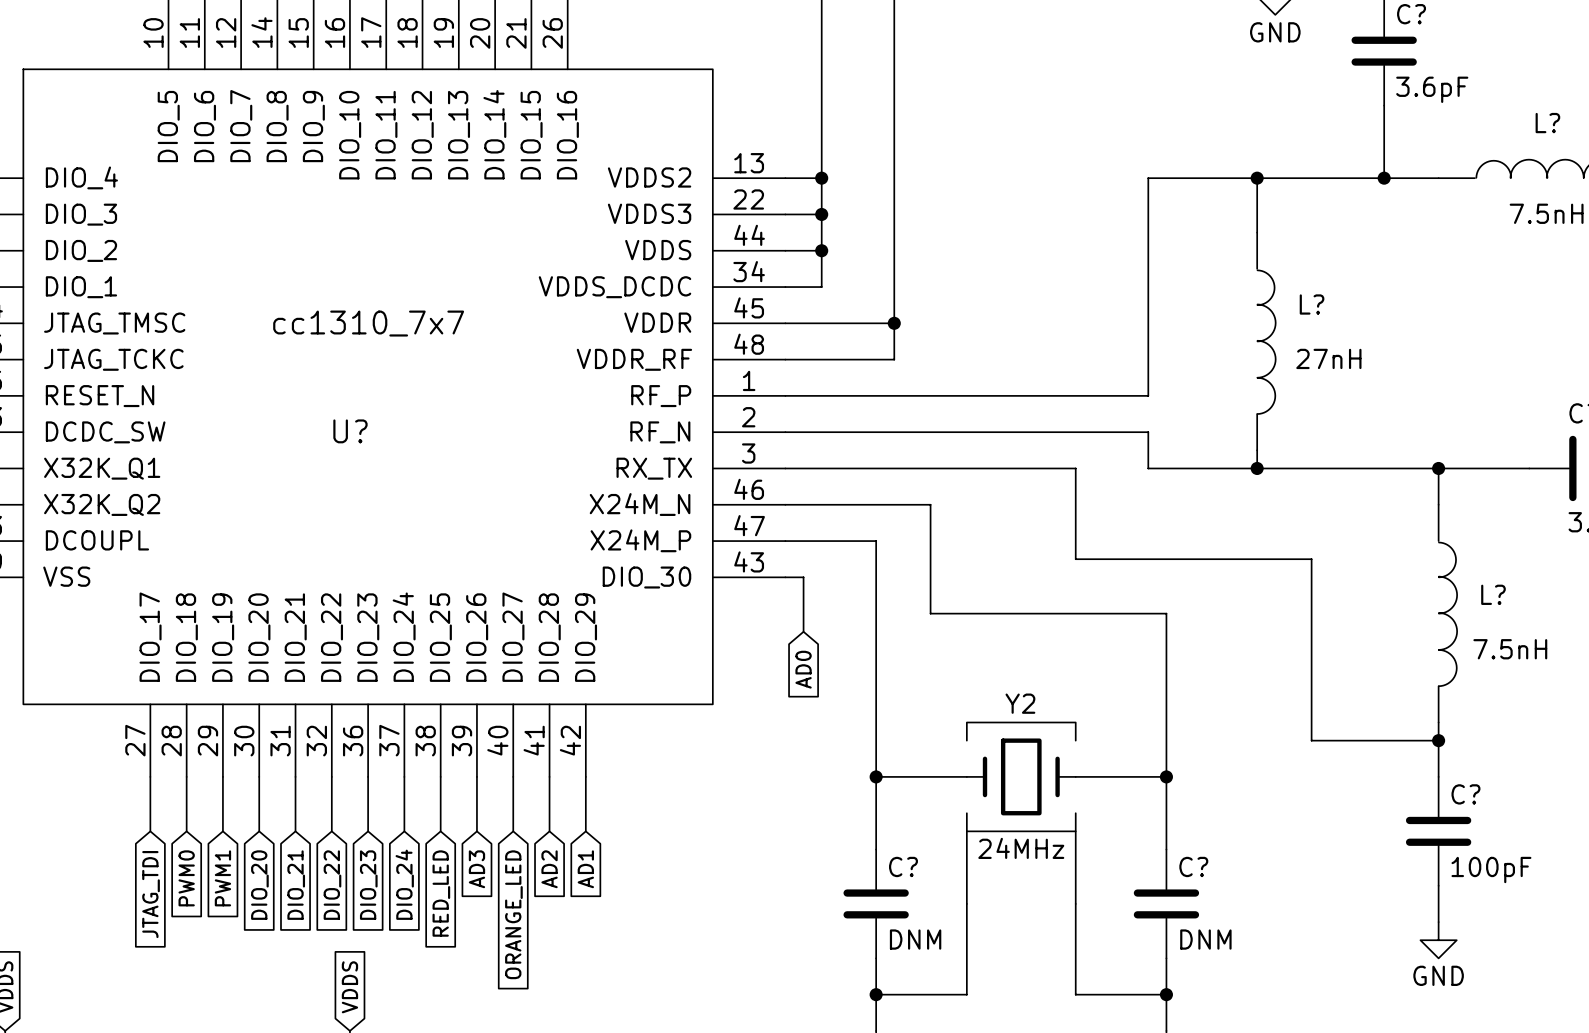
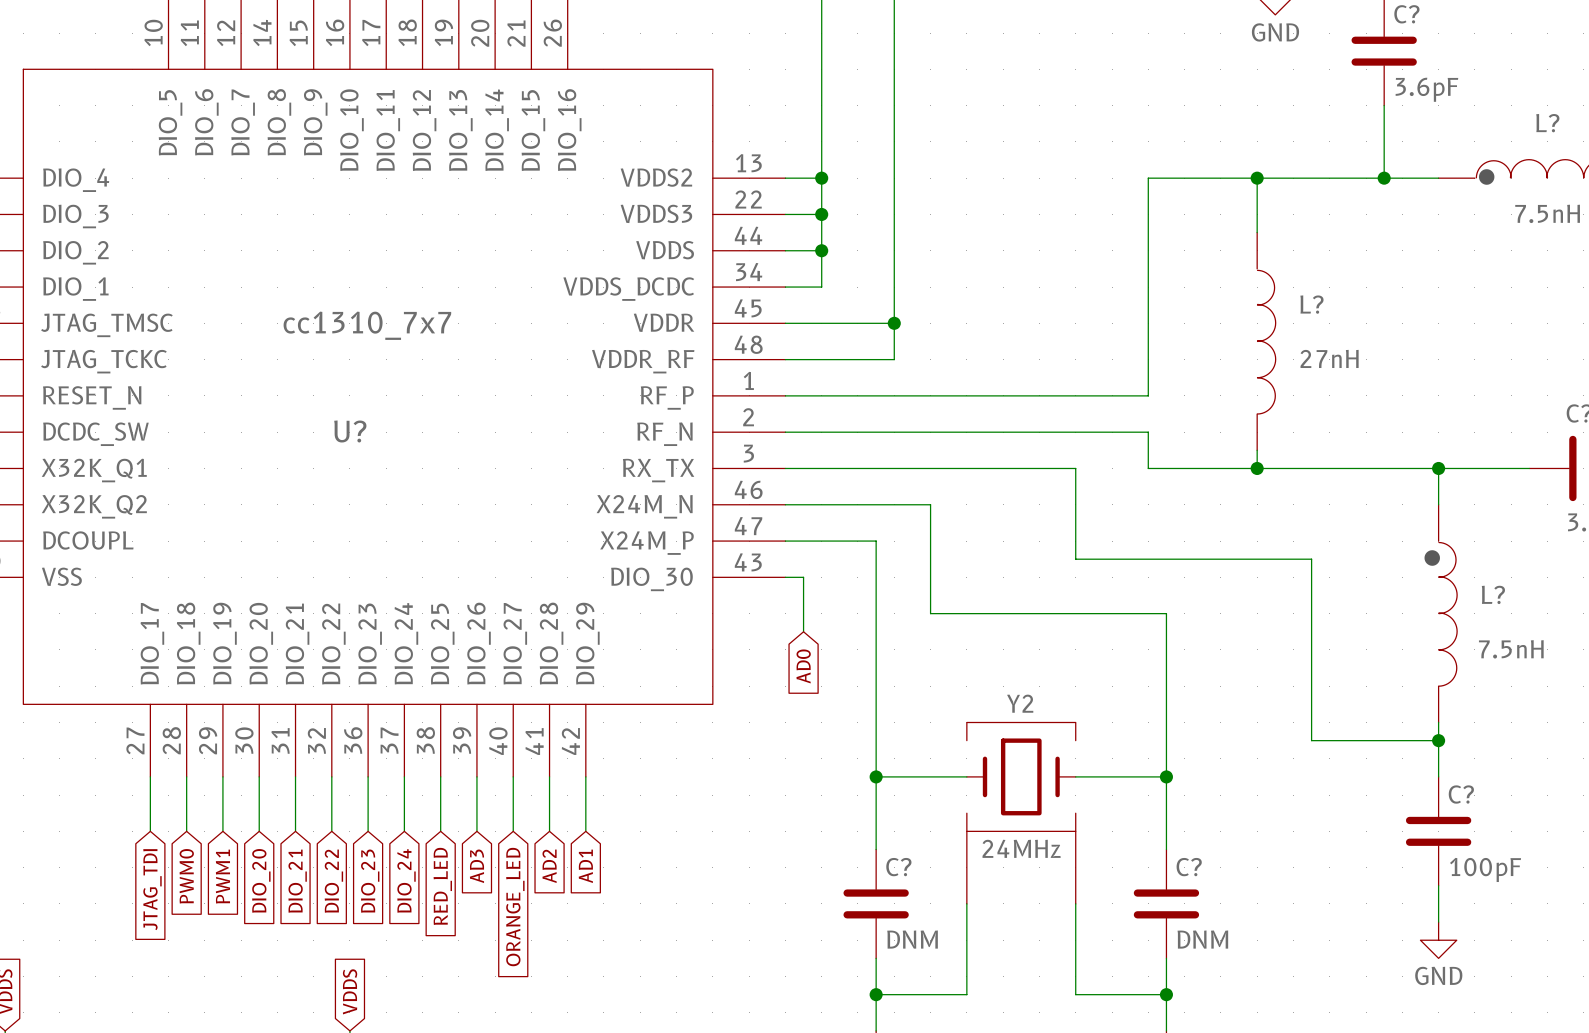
text: none -> . (1486, 176)
text: none -> . (1432, 558)

